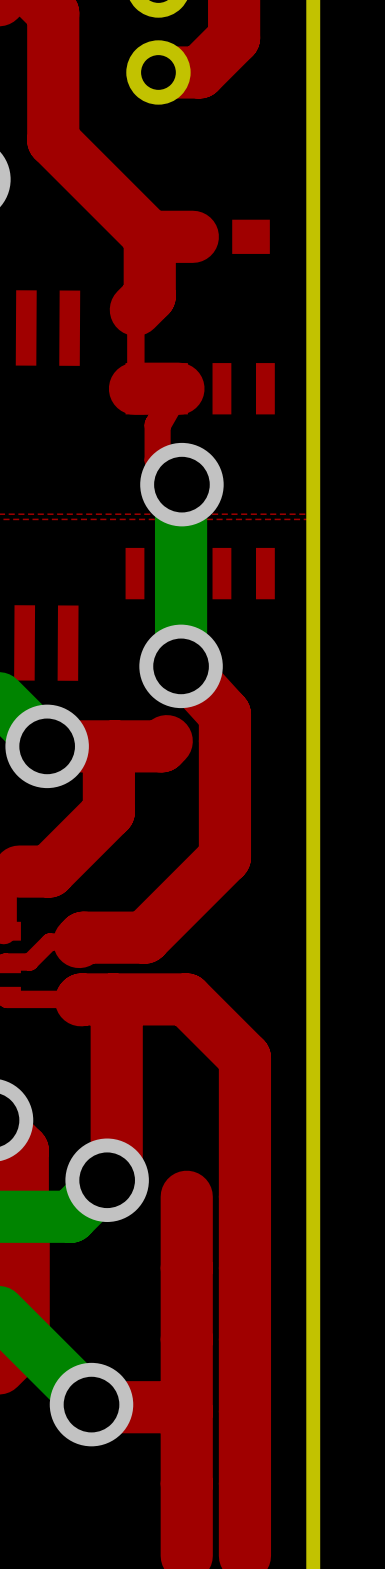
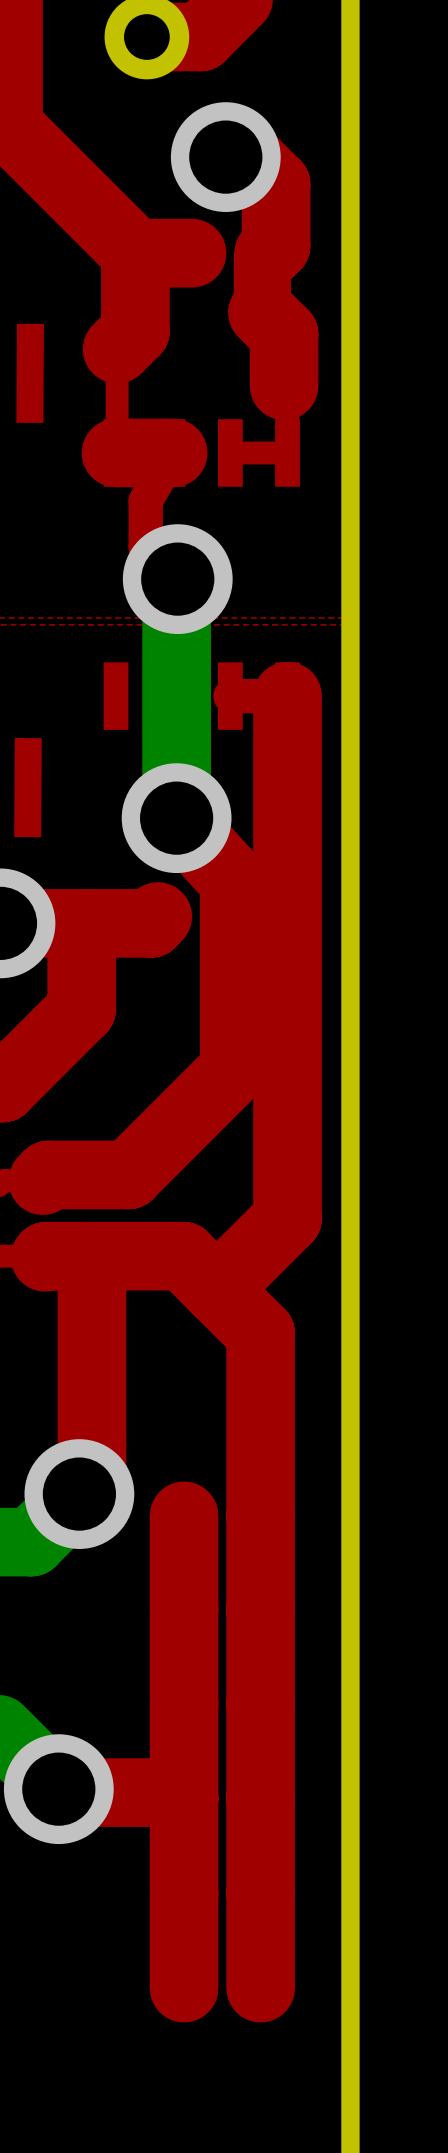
top track: none -> (225, 157) (248, 157) (276, 184) (276, 245) (262, 259) (262, 312) (284, 334) (284, 385) (287, 389) (287, 452) (230, 452)
via: none -> (225, 157)
top track: none -> (230, 696) (287, 696) (287, 1218) (216, 1289)

